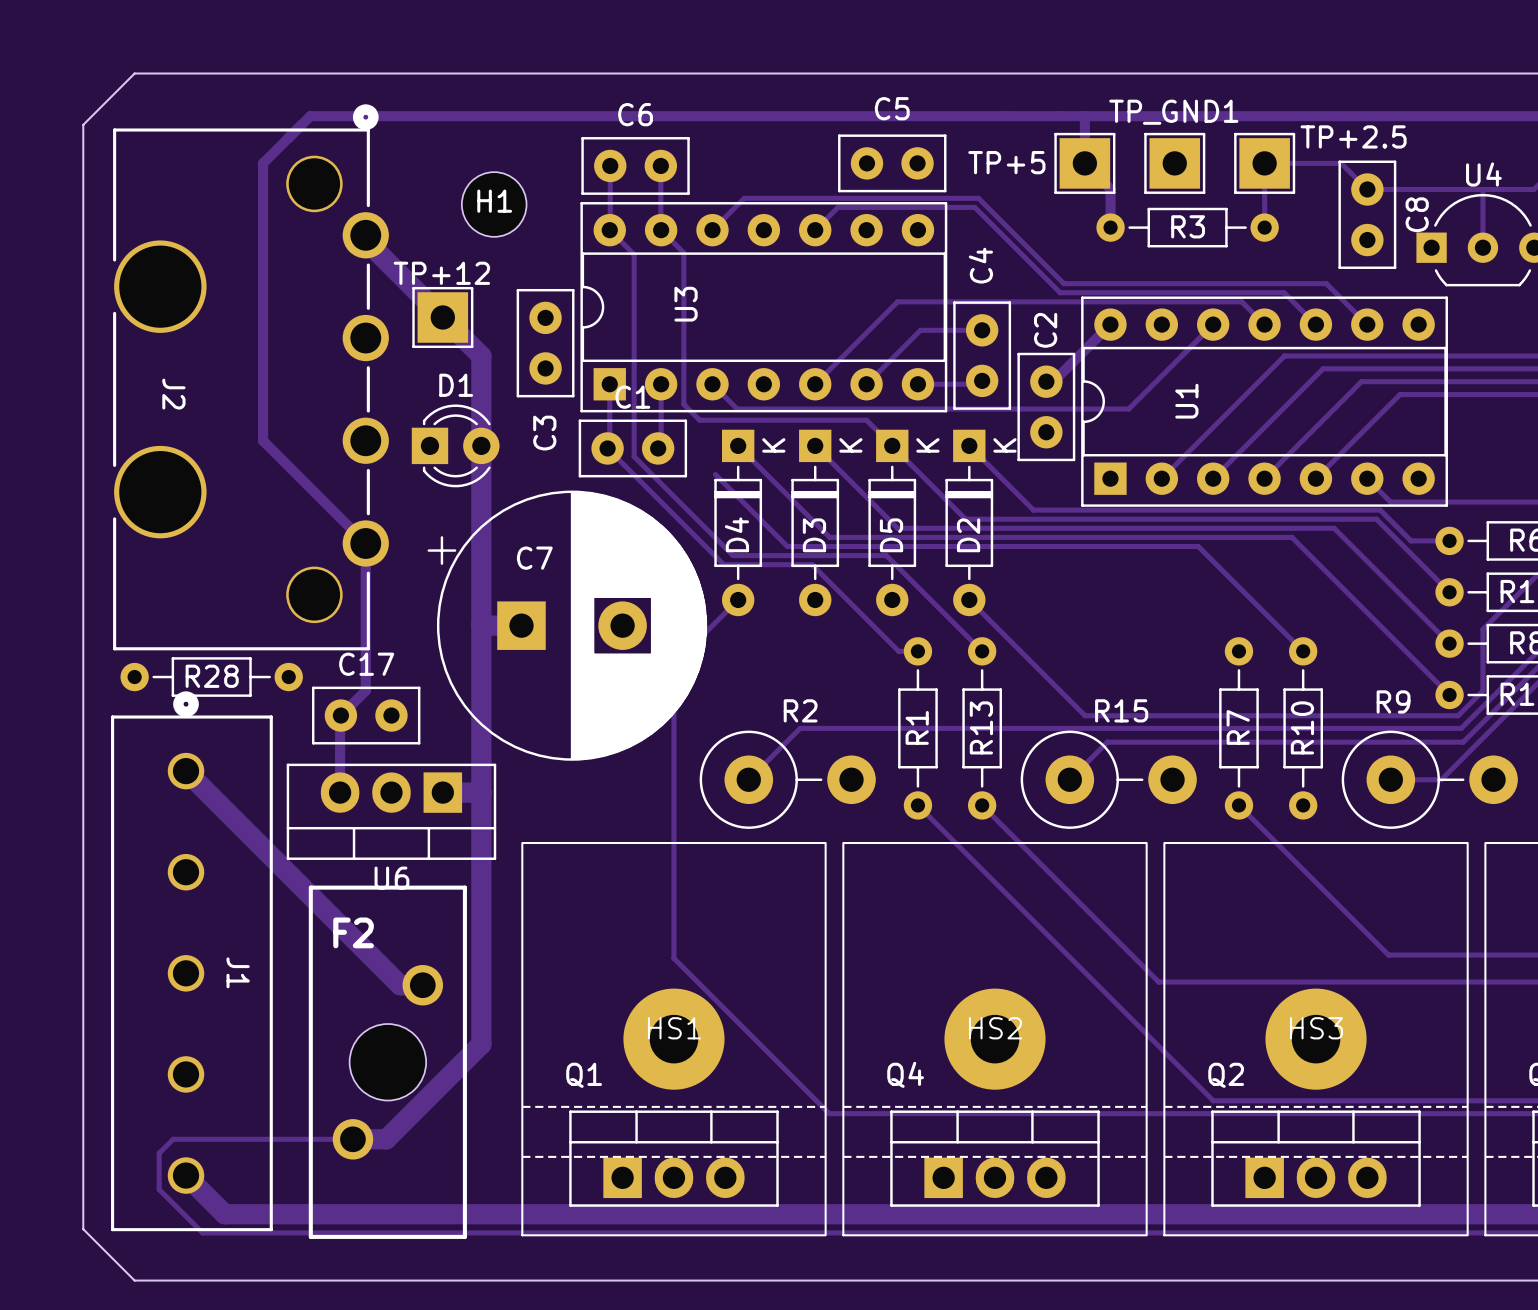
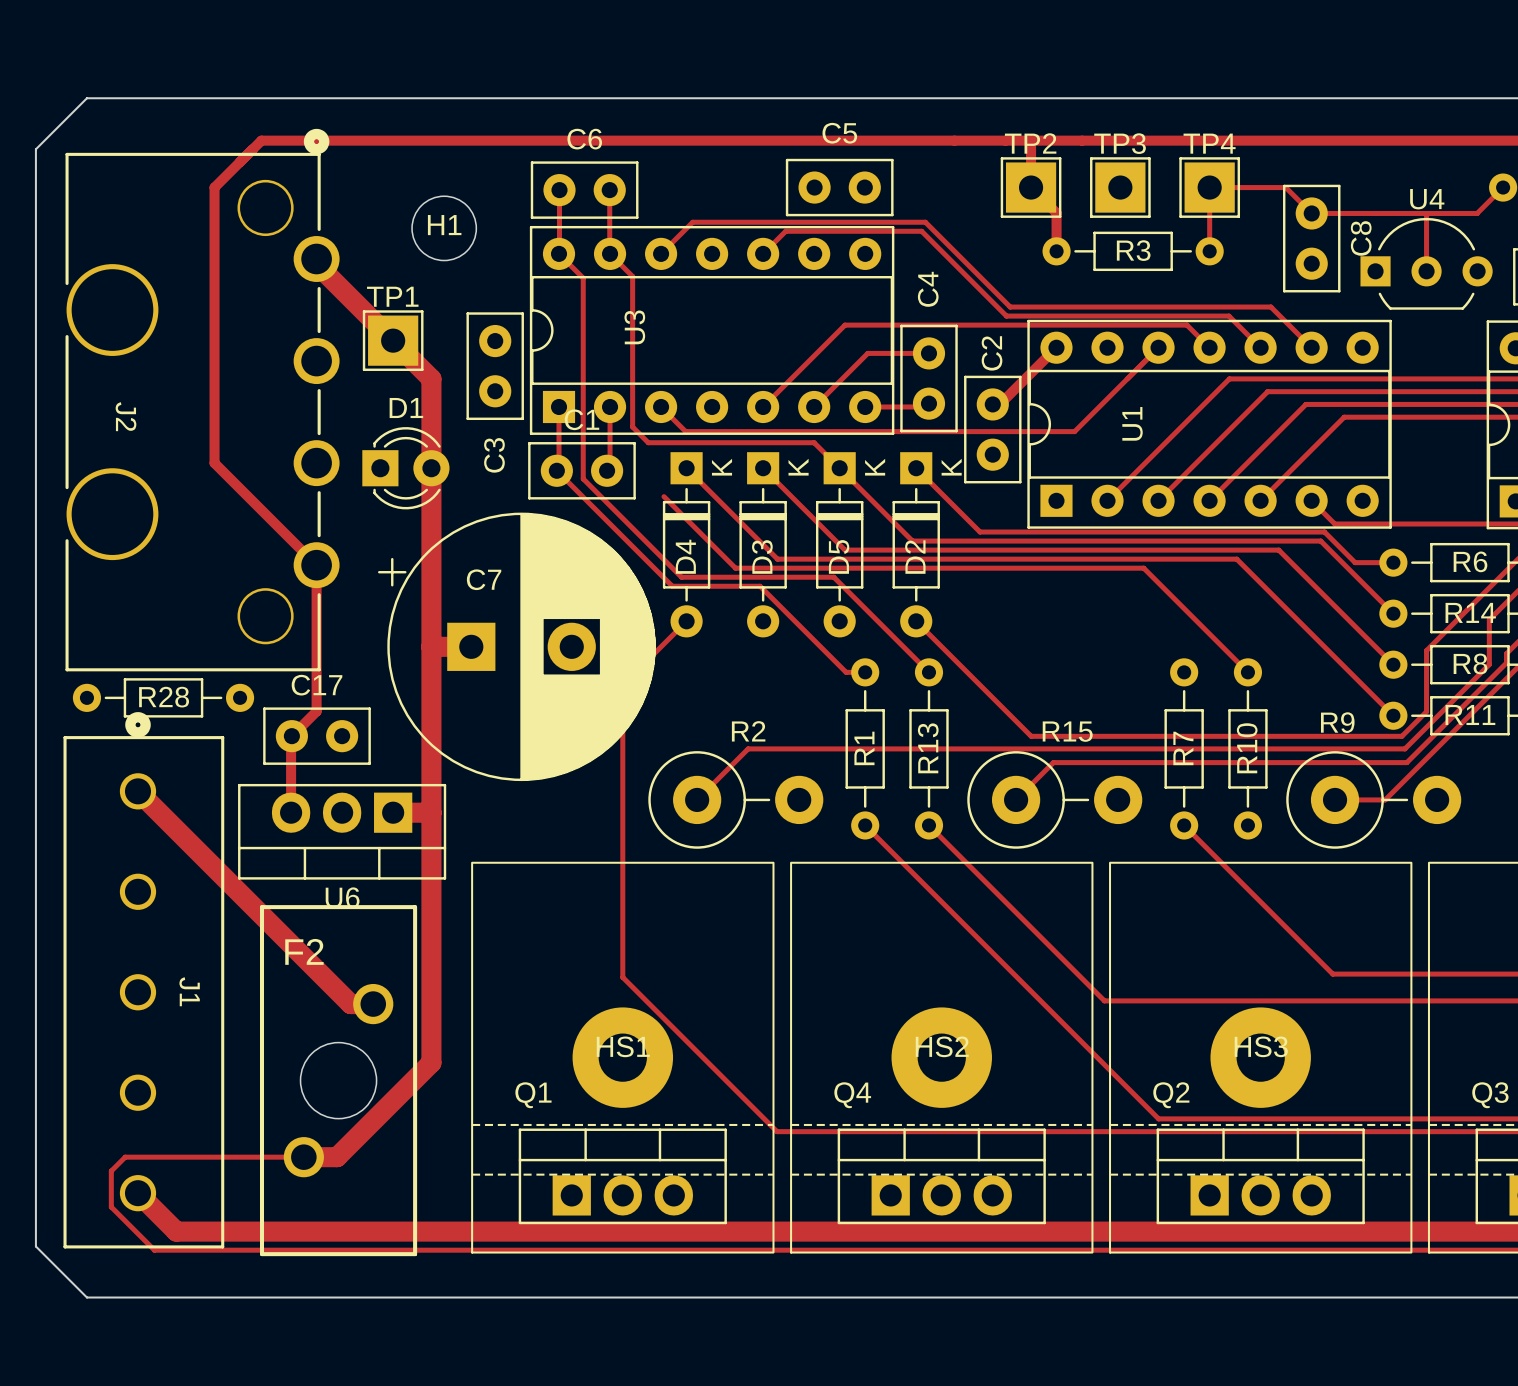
TP_GND1 name: TP_GND1 (1173, 112) -> TP3 (1120, 143)
TP+2.5 name: TP+2.5 (1353, 136) -> TP4 (1209, 143)
TP+5 name: TP+5 (1006, 162) -> TP2 (1030, 143)
TP+12 name: TP+12 (441, 273) -> TP1 (392, 296)

